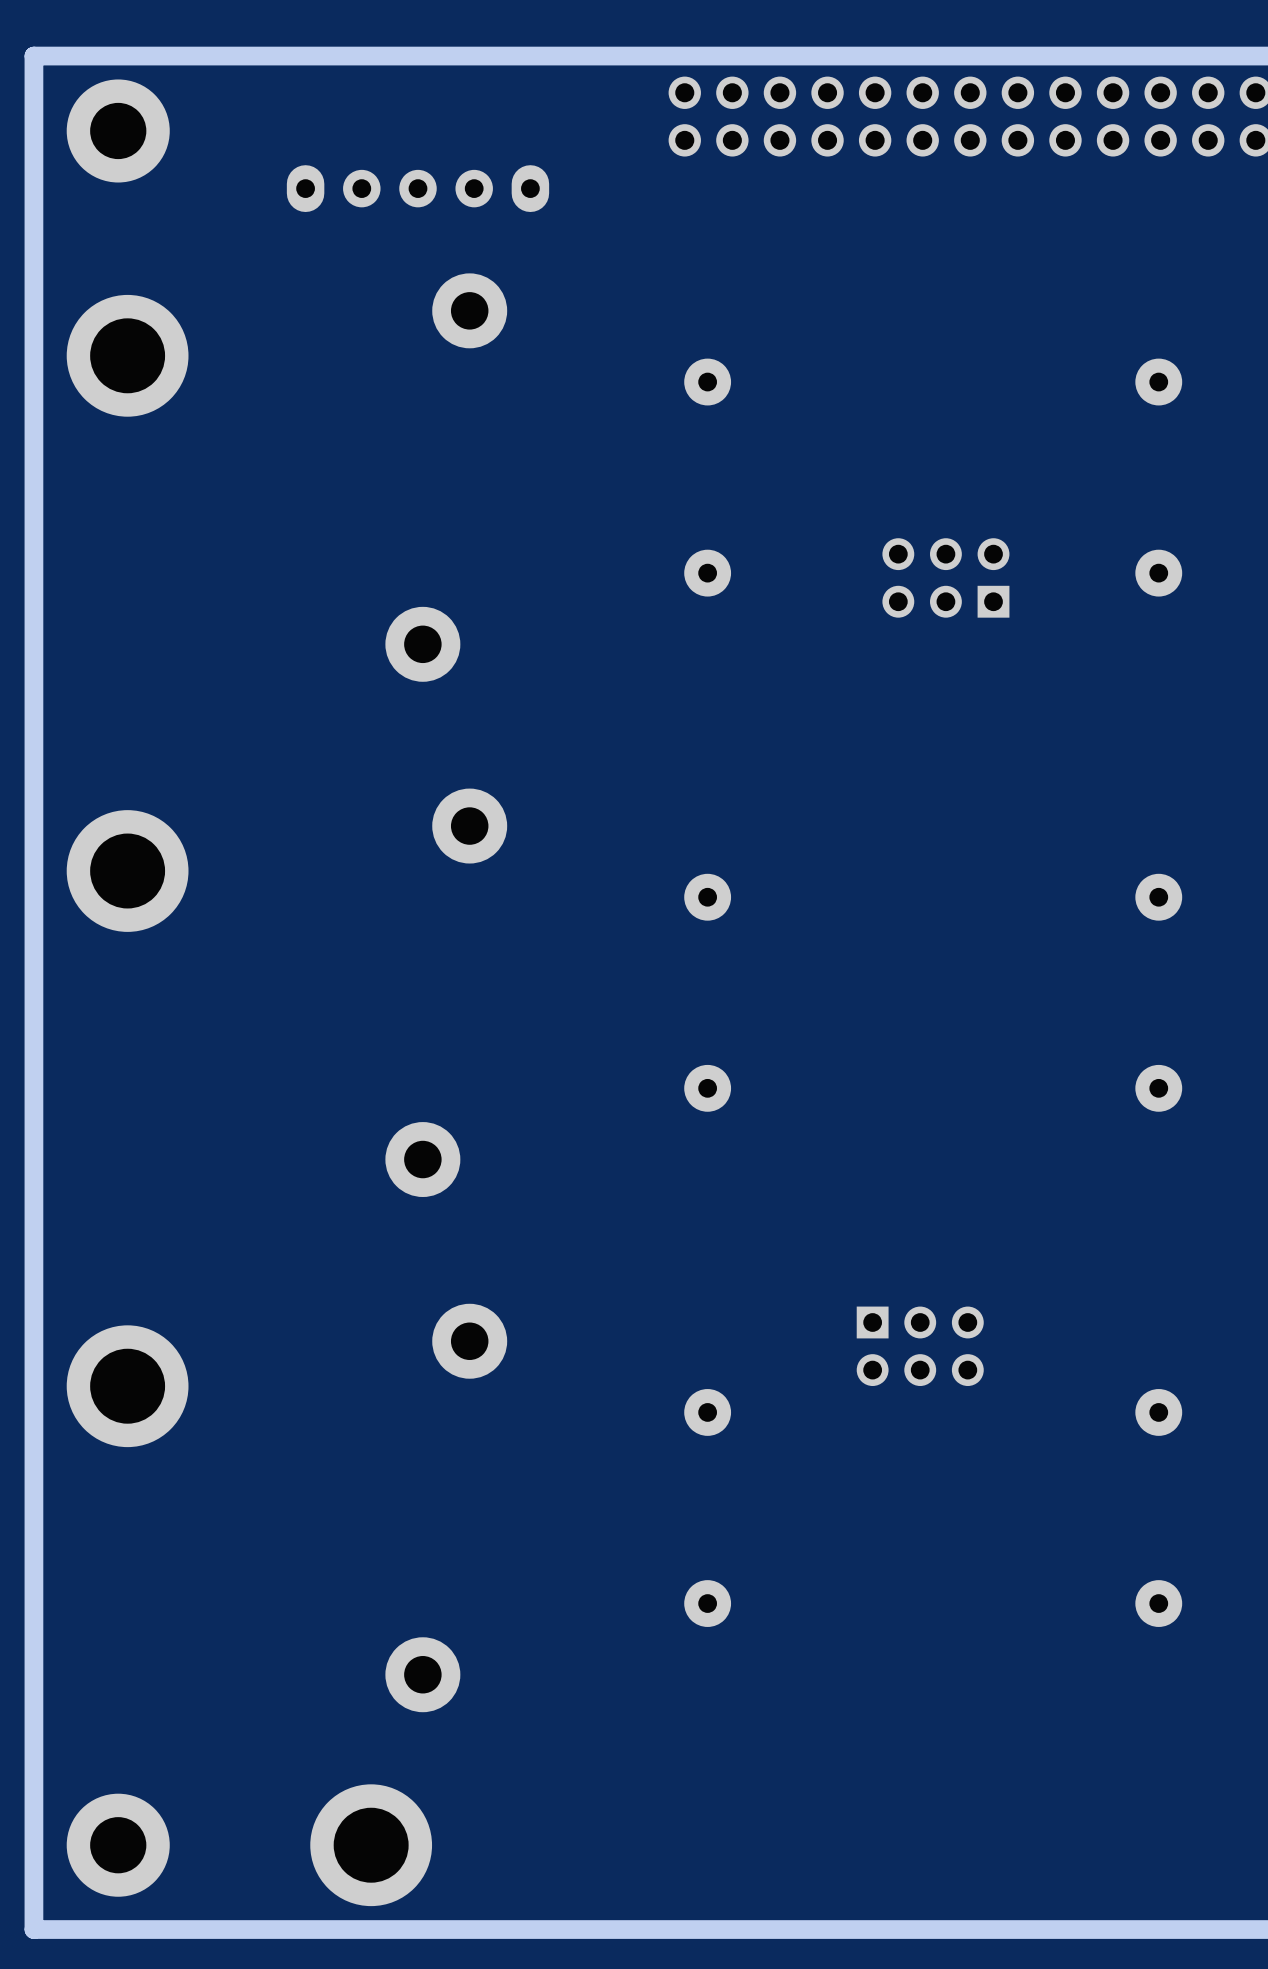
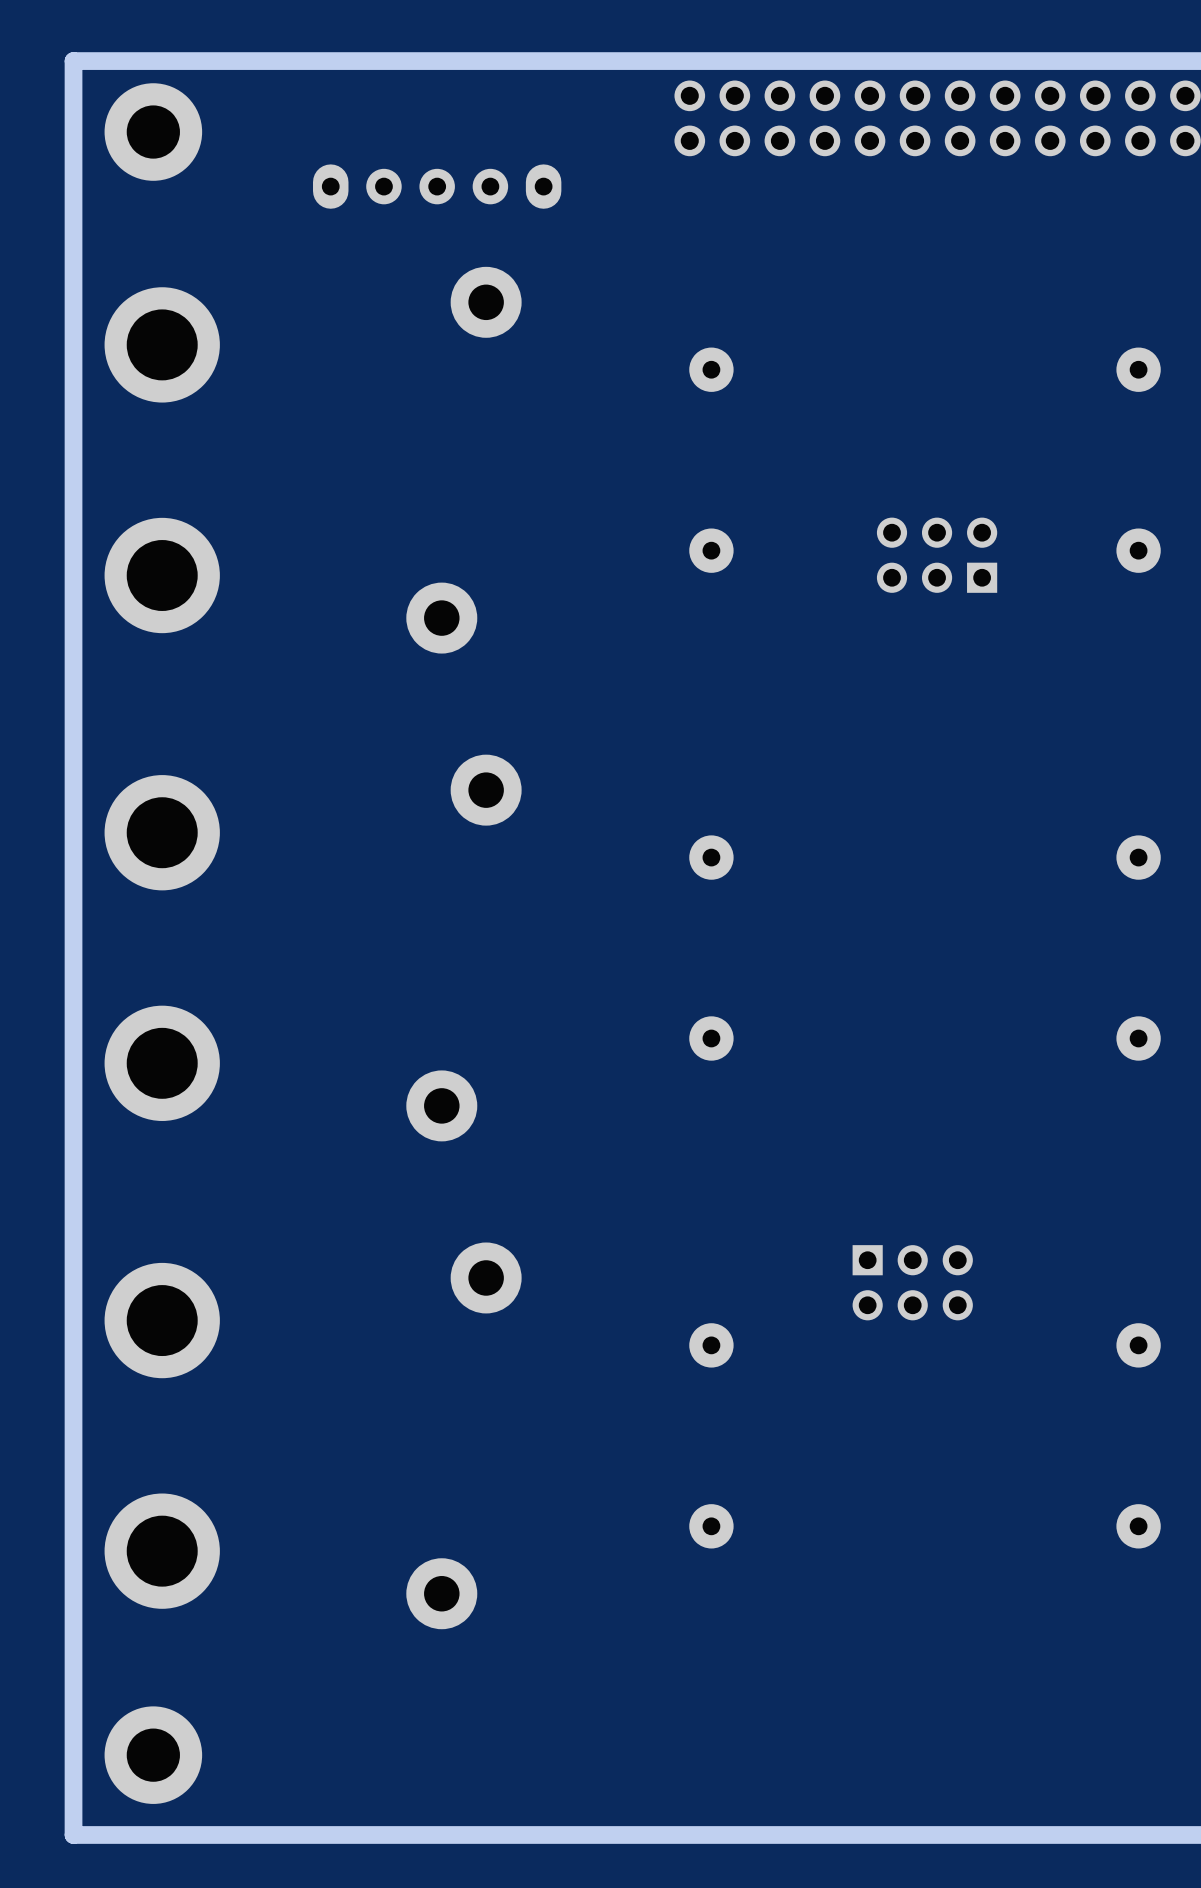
part: none -> (162, 575)
part: none -> (162, 1063)
part position: (371, 1845) -> (162, 1551)

